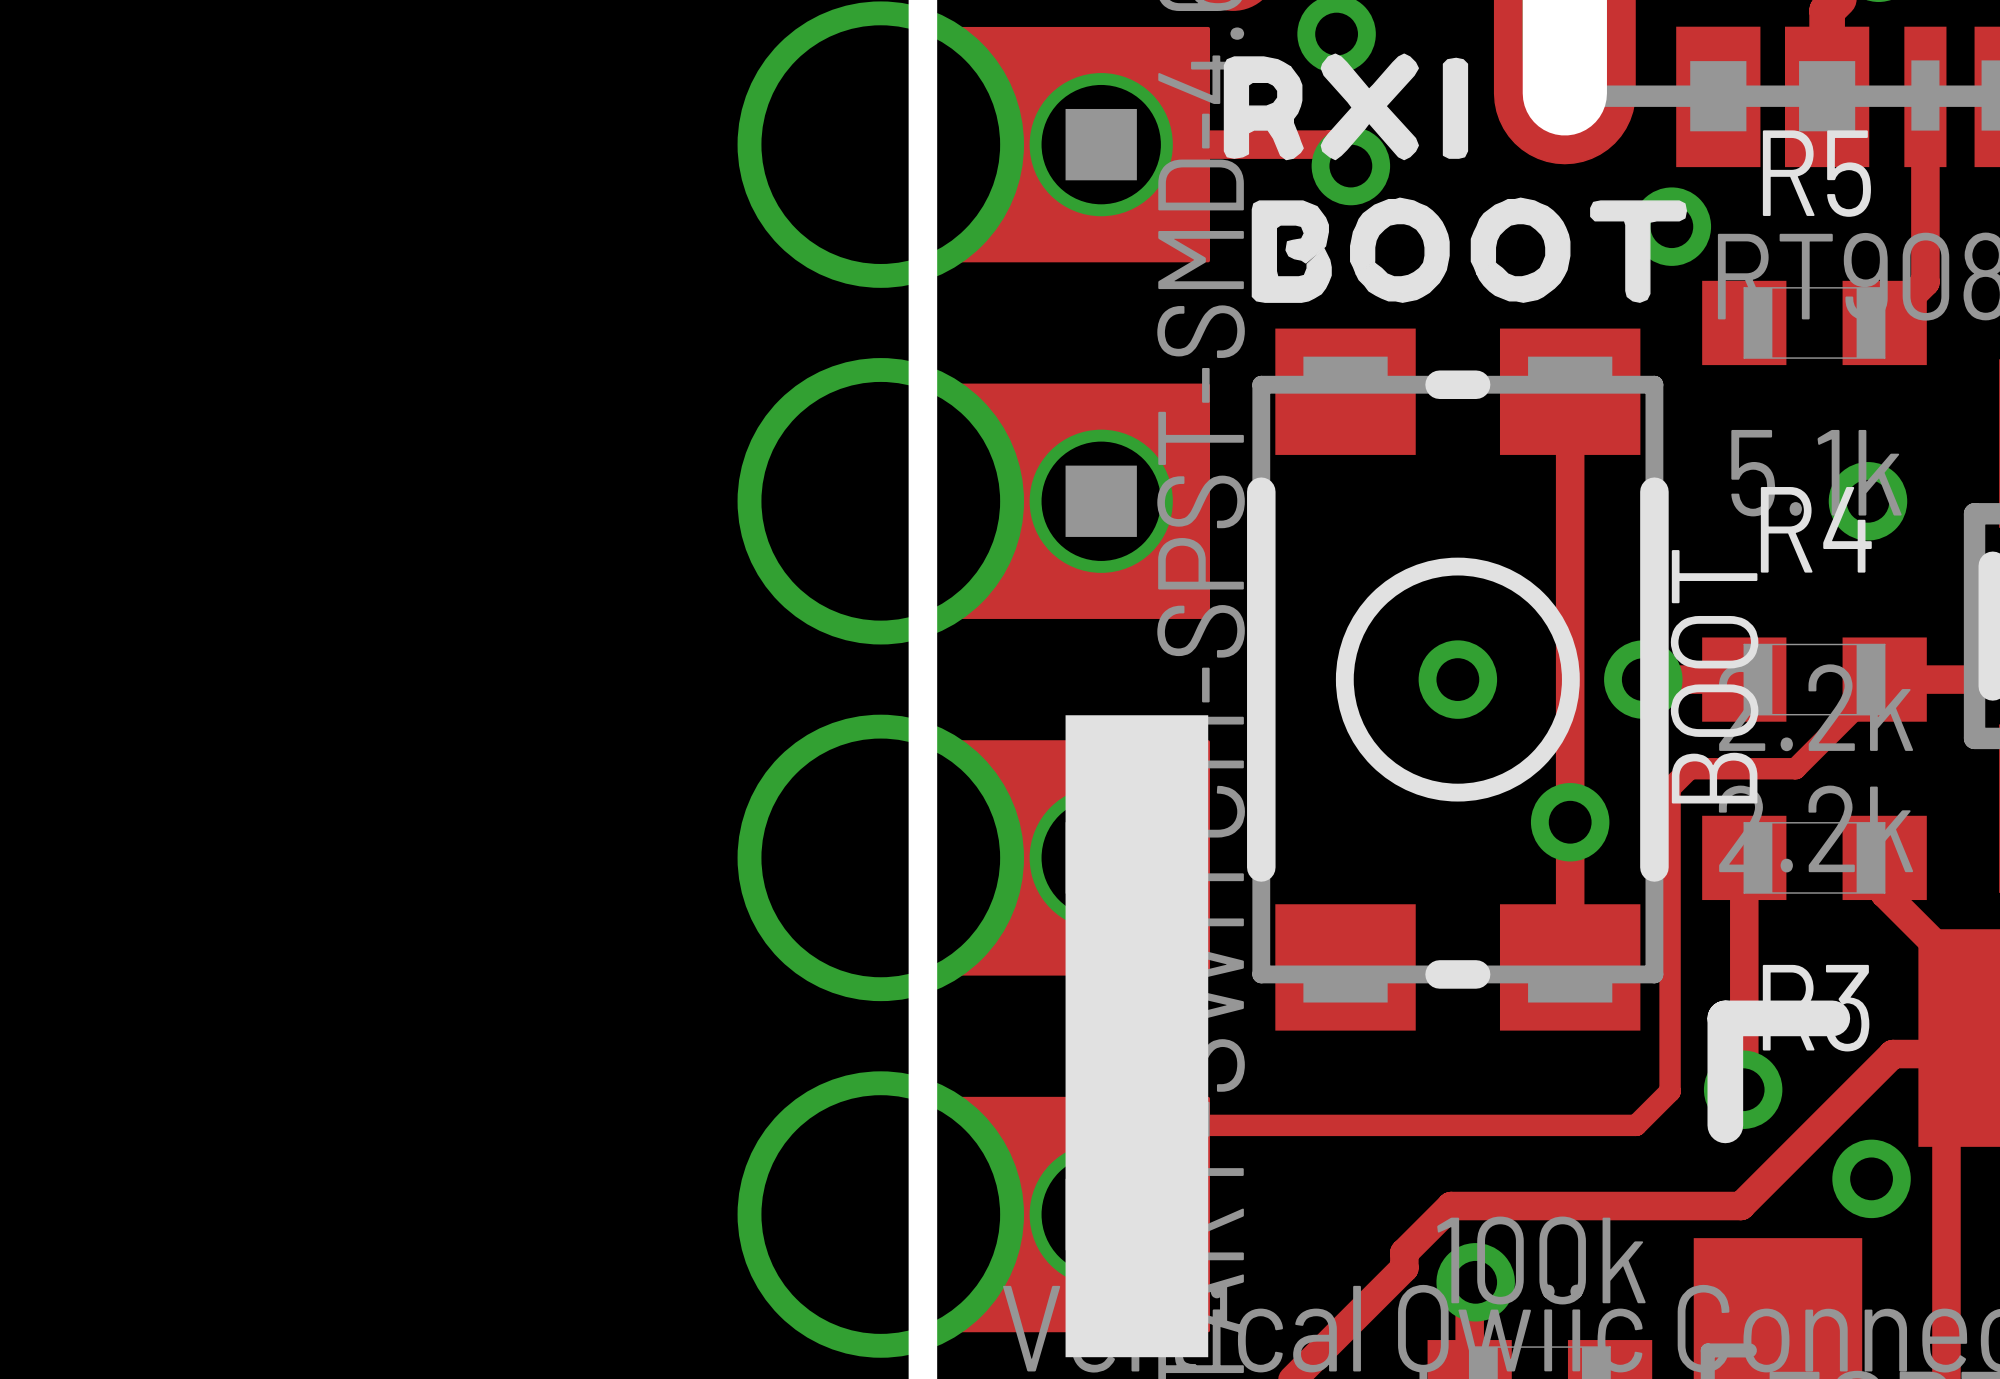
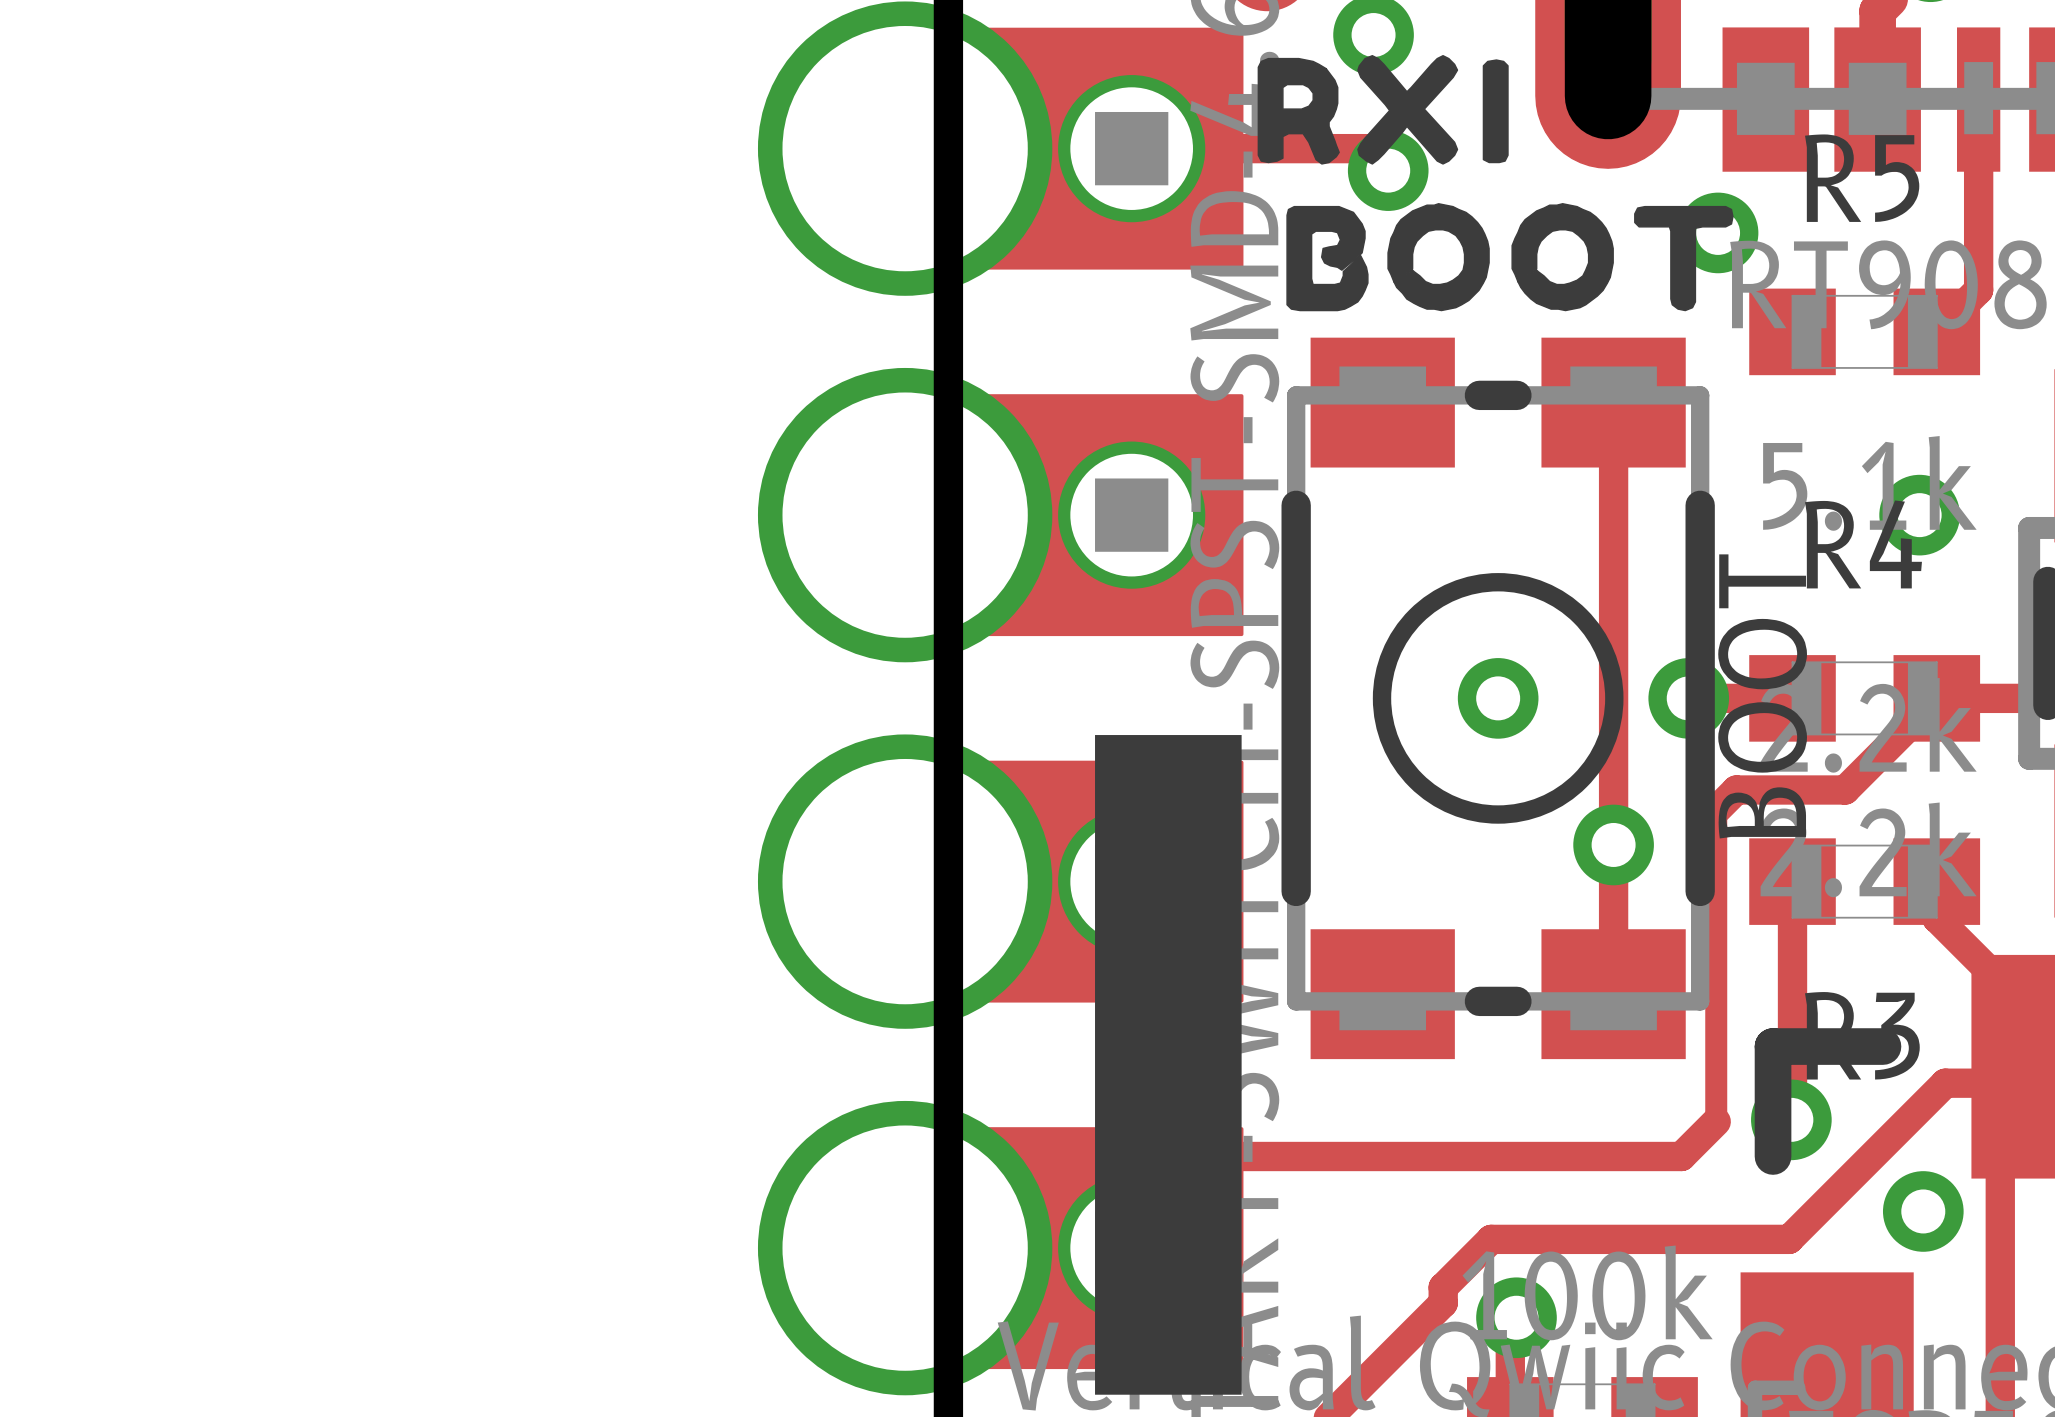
track width: thin (1884, 679) (1795, 768) (1689, 768) (1670, 788) -> thick (1936, 698) (1845, 790) (1736, 790) (1716, 810)
track width: thin (1670, 1091) (1636, 1125) (1190, 1125) -> thick (1716, 1121) (1681, 1156) (1223, 1156)

